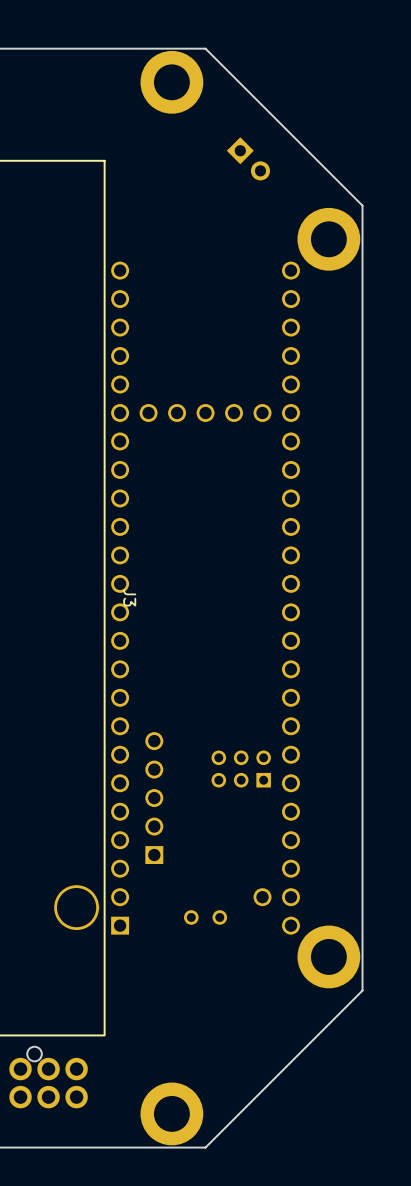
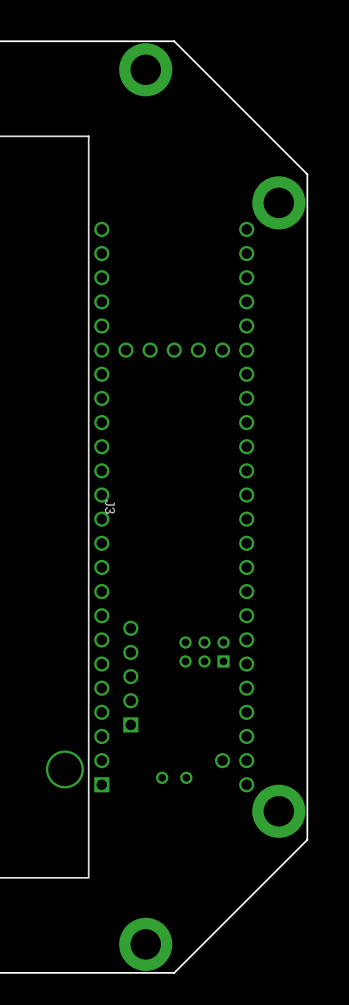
part: (248, 158) -> none
part: (48, 1077) -> none

